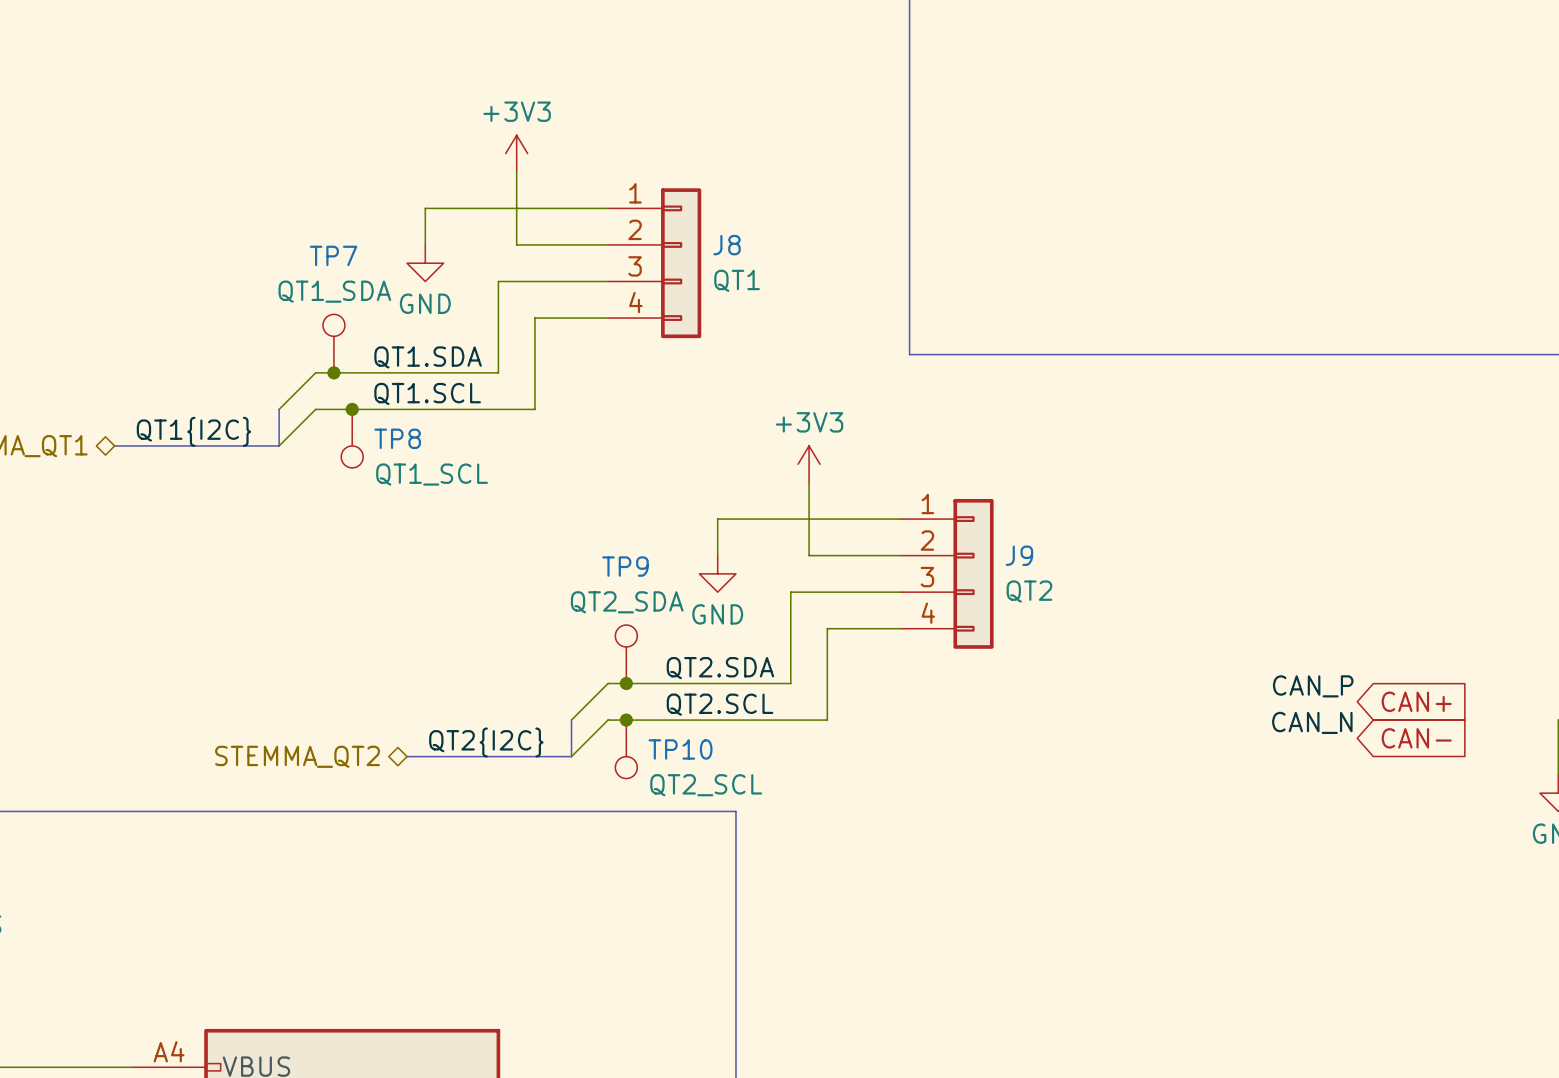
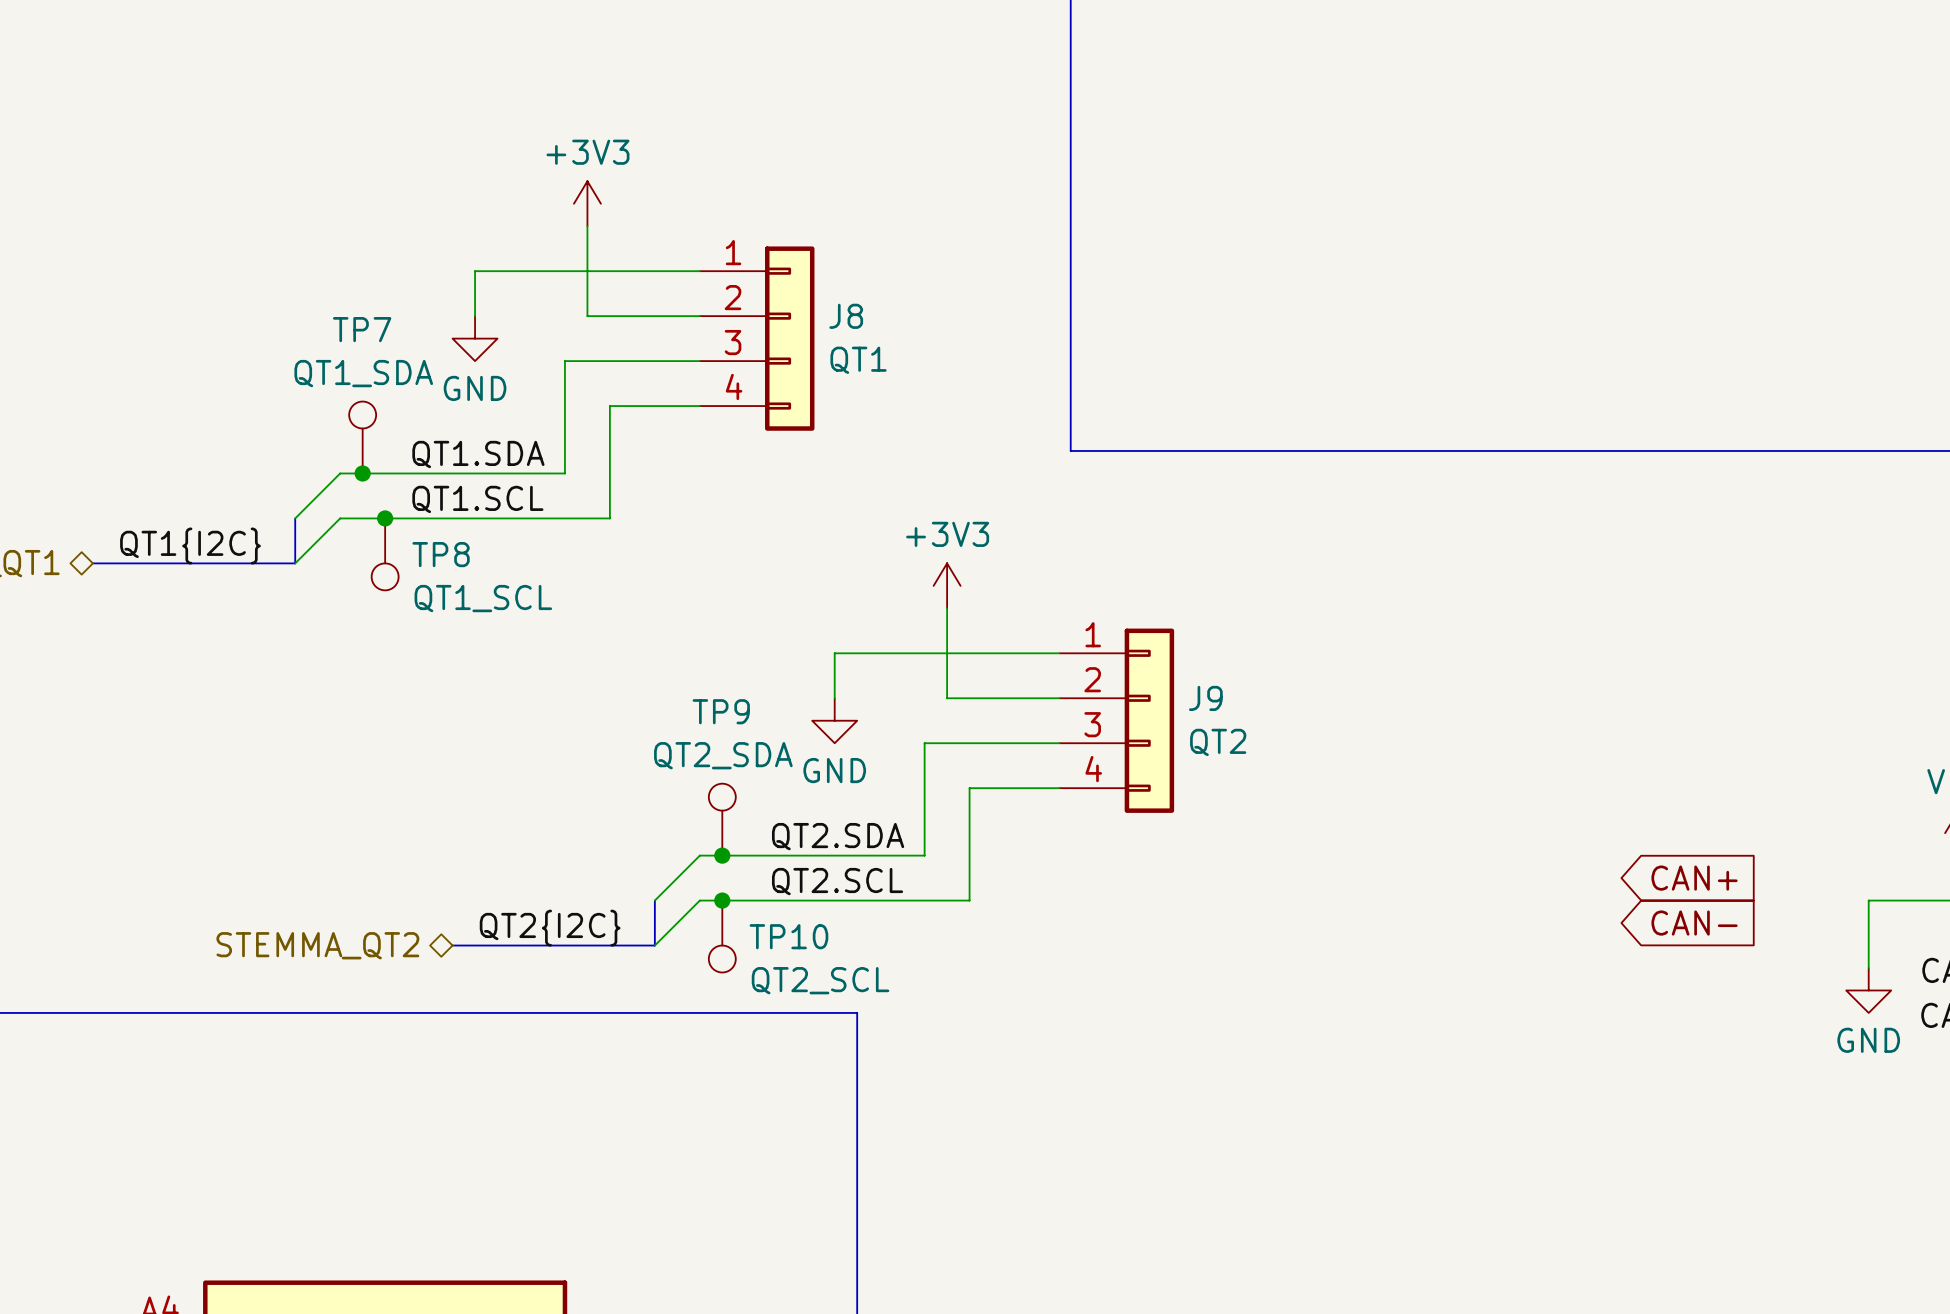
label: CAN_P (1313, 686) -> none
label: CAN_N (1312, 722) -> none

